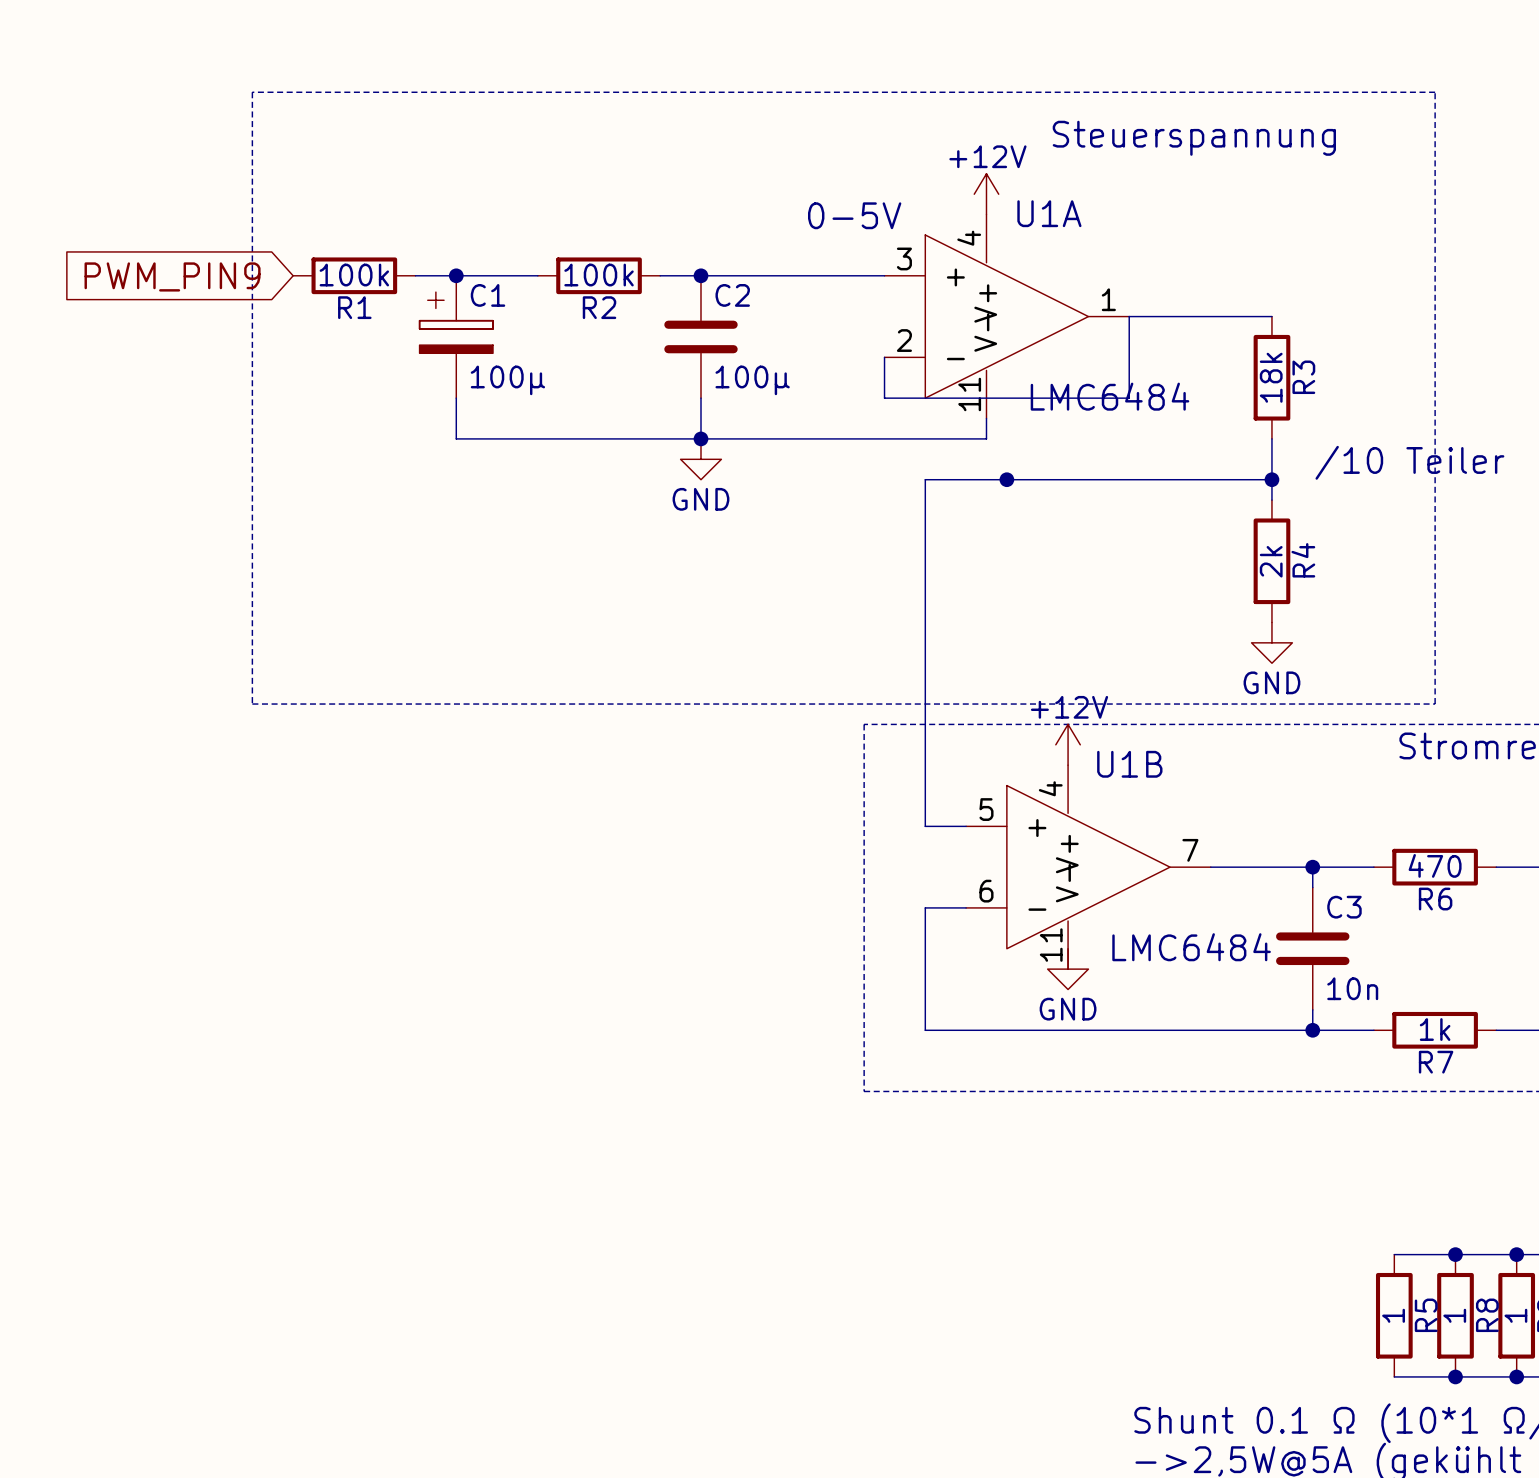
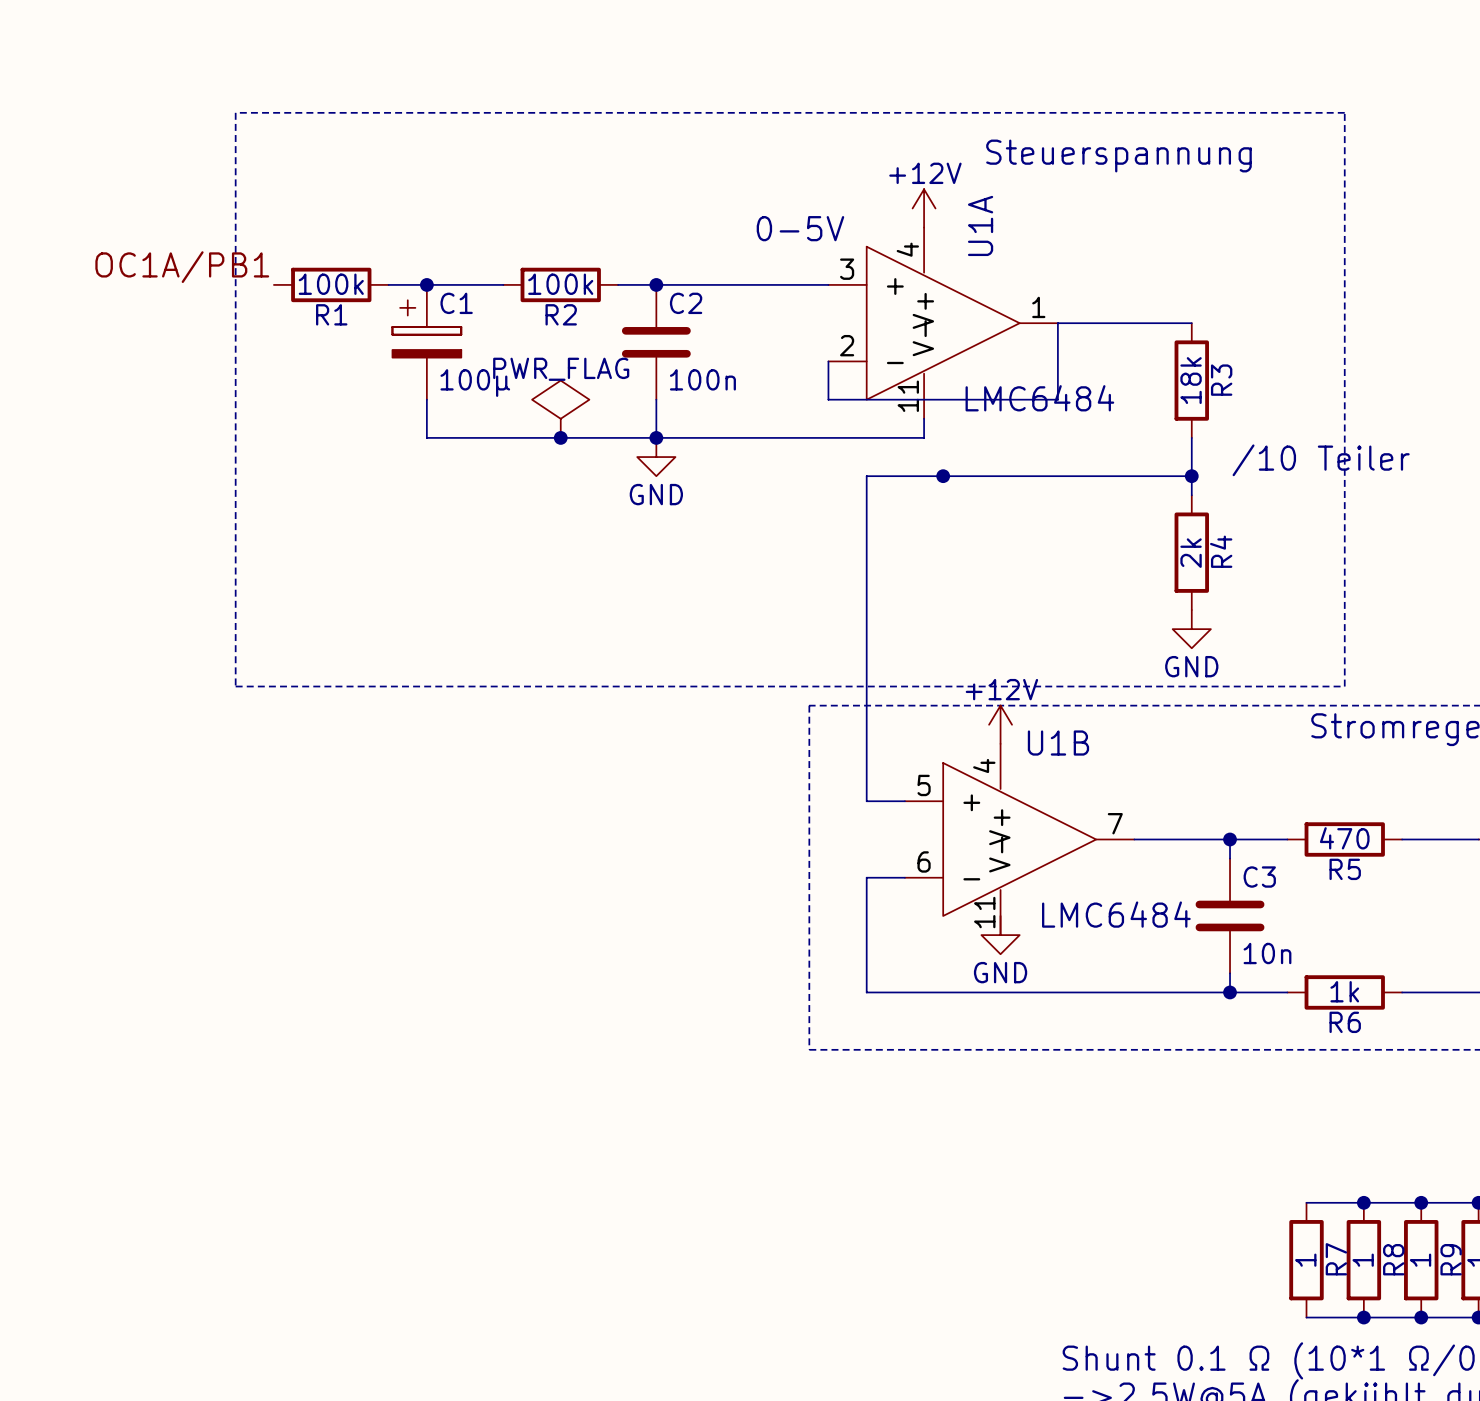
U1A name rotation: 0° (1049, 213) -> 90° counterclockwise (980, 225)
label: none -> OC1A/PB1 (182, 267)
global label: PWM_PIN9 (172, 276) -> none
C2 value: 100µ (752, 380) -> 100n (702, 379)
power symbol: none -> PWR_FLAG (560, 409)
junction: none -> (560, 437)
R6 name: R6 (1435, 899) -> R5 (1345, 869)
R7 name: R7 (1436, 1062) -> R6 (1345, 1022)
R5 name: R5 (1426, 1315) -> R7 (1336, 1259)

